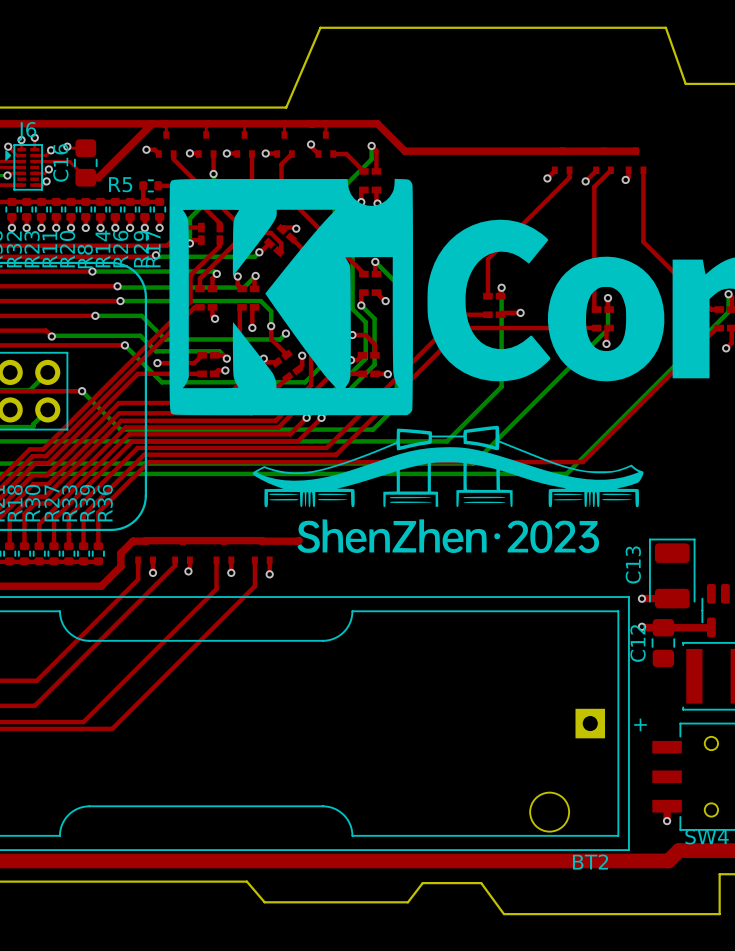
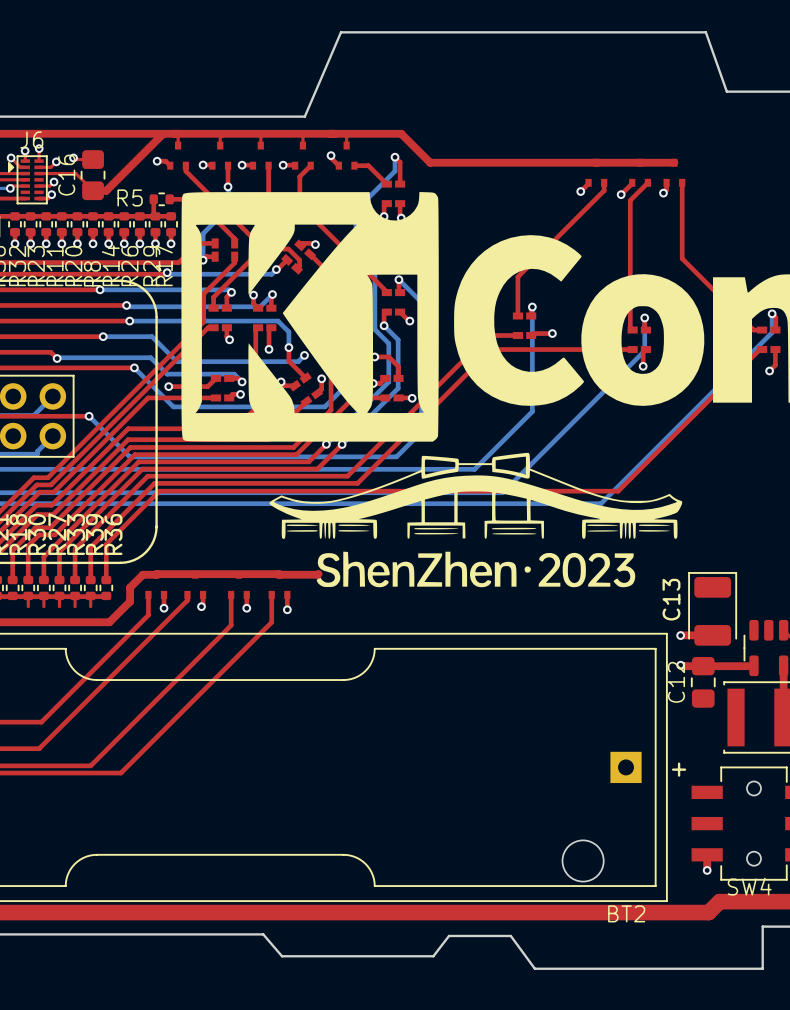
top track: none -> (28, 595) (28, 606)
top track: none -> (43, 595) (43, 606)
top track: none -> (59, 595) (59, 606)
top track: none -> (75, 595) (75, 606)
top track: none -> (90, 595) (90, 606)

